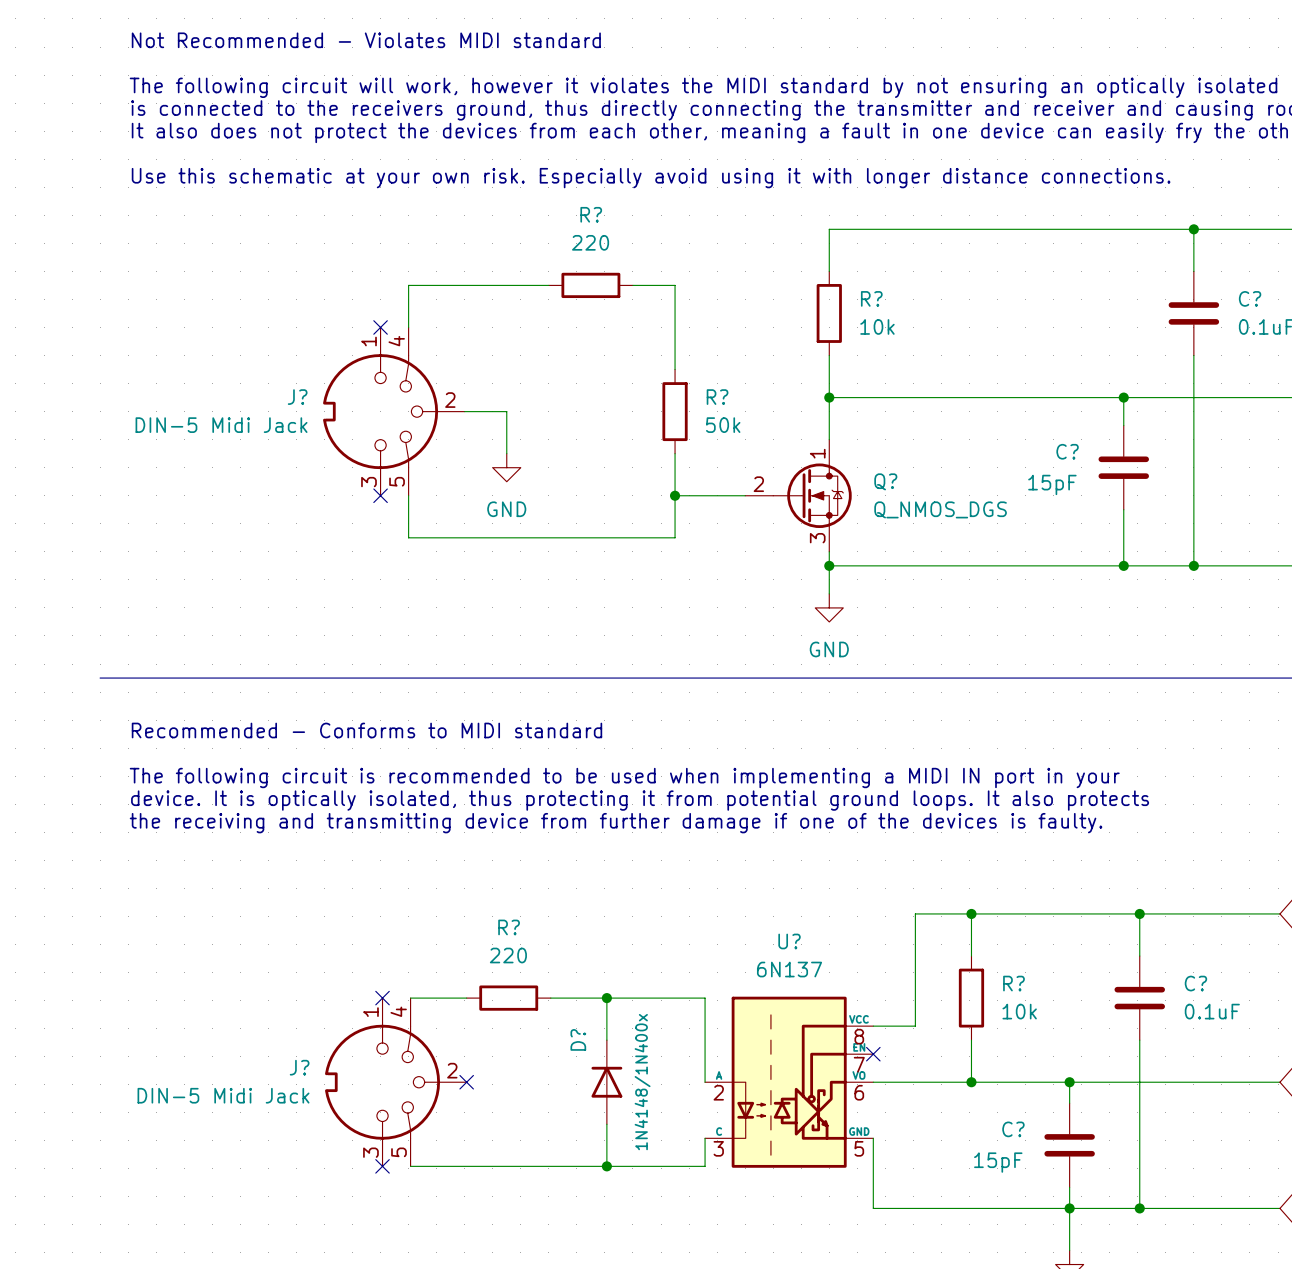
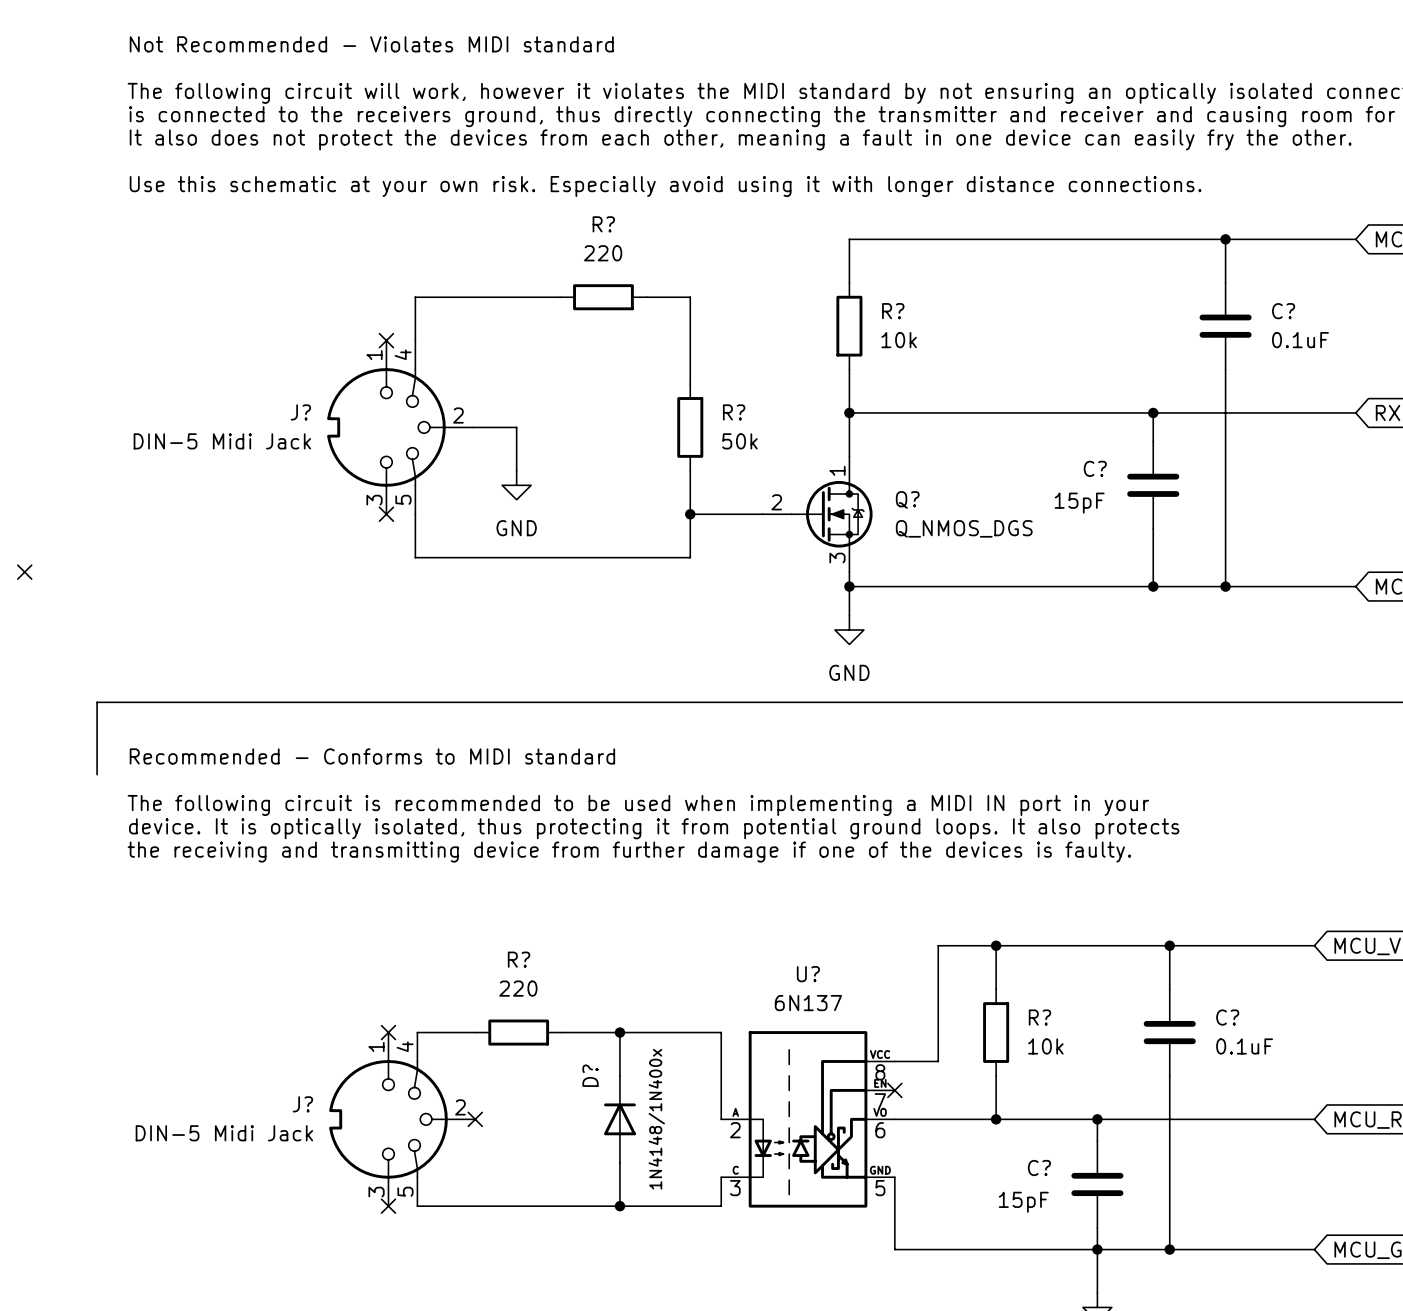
no-connect mark: none -> (24, 572)
line: none -> (97, 702) (97, 774)

